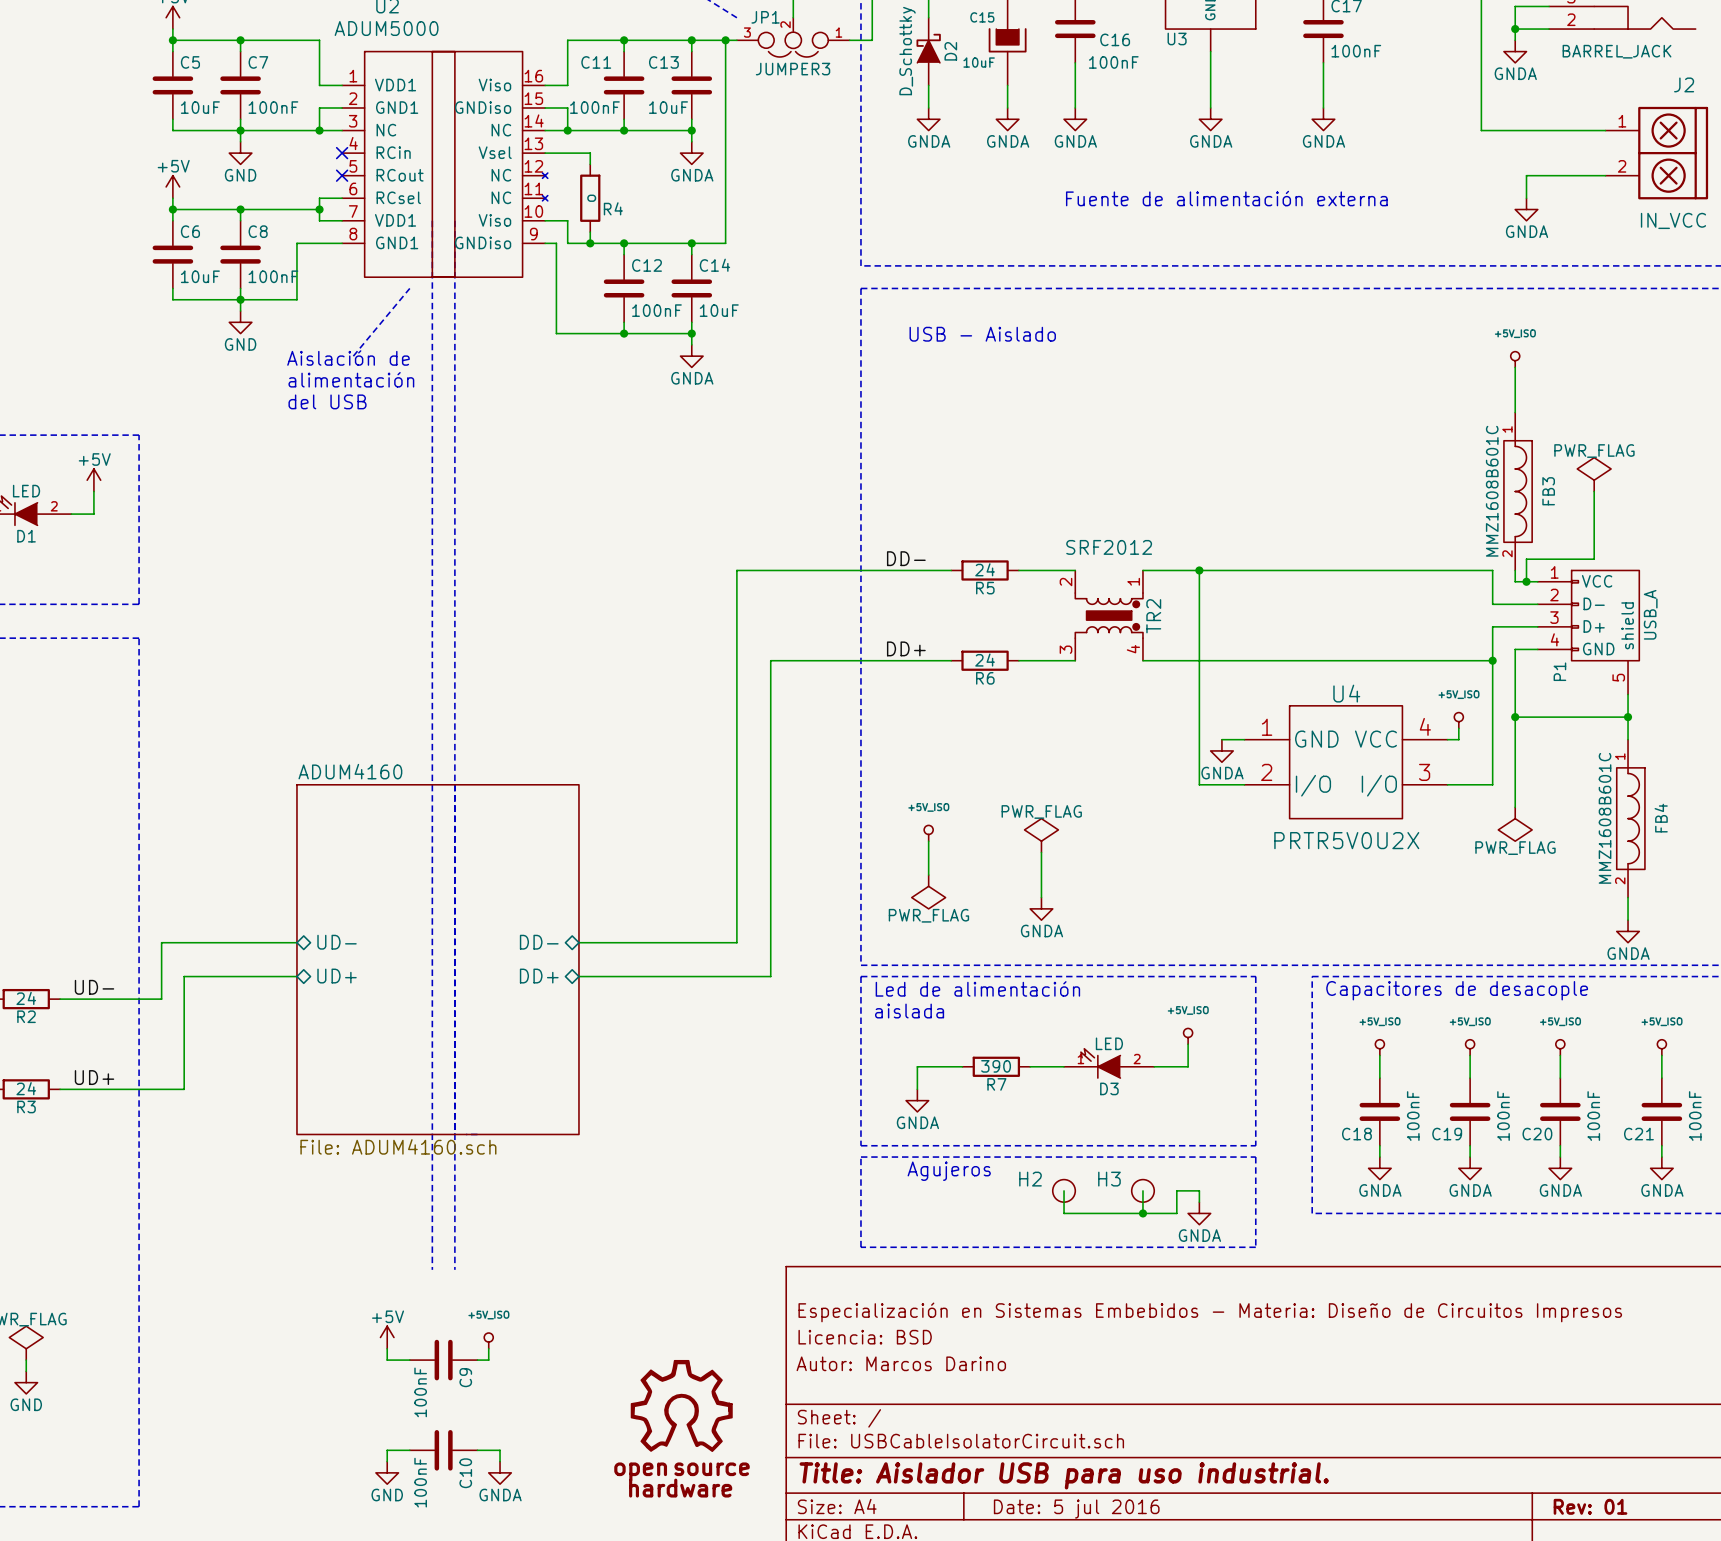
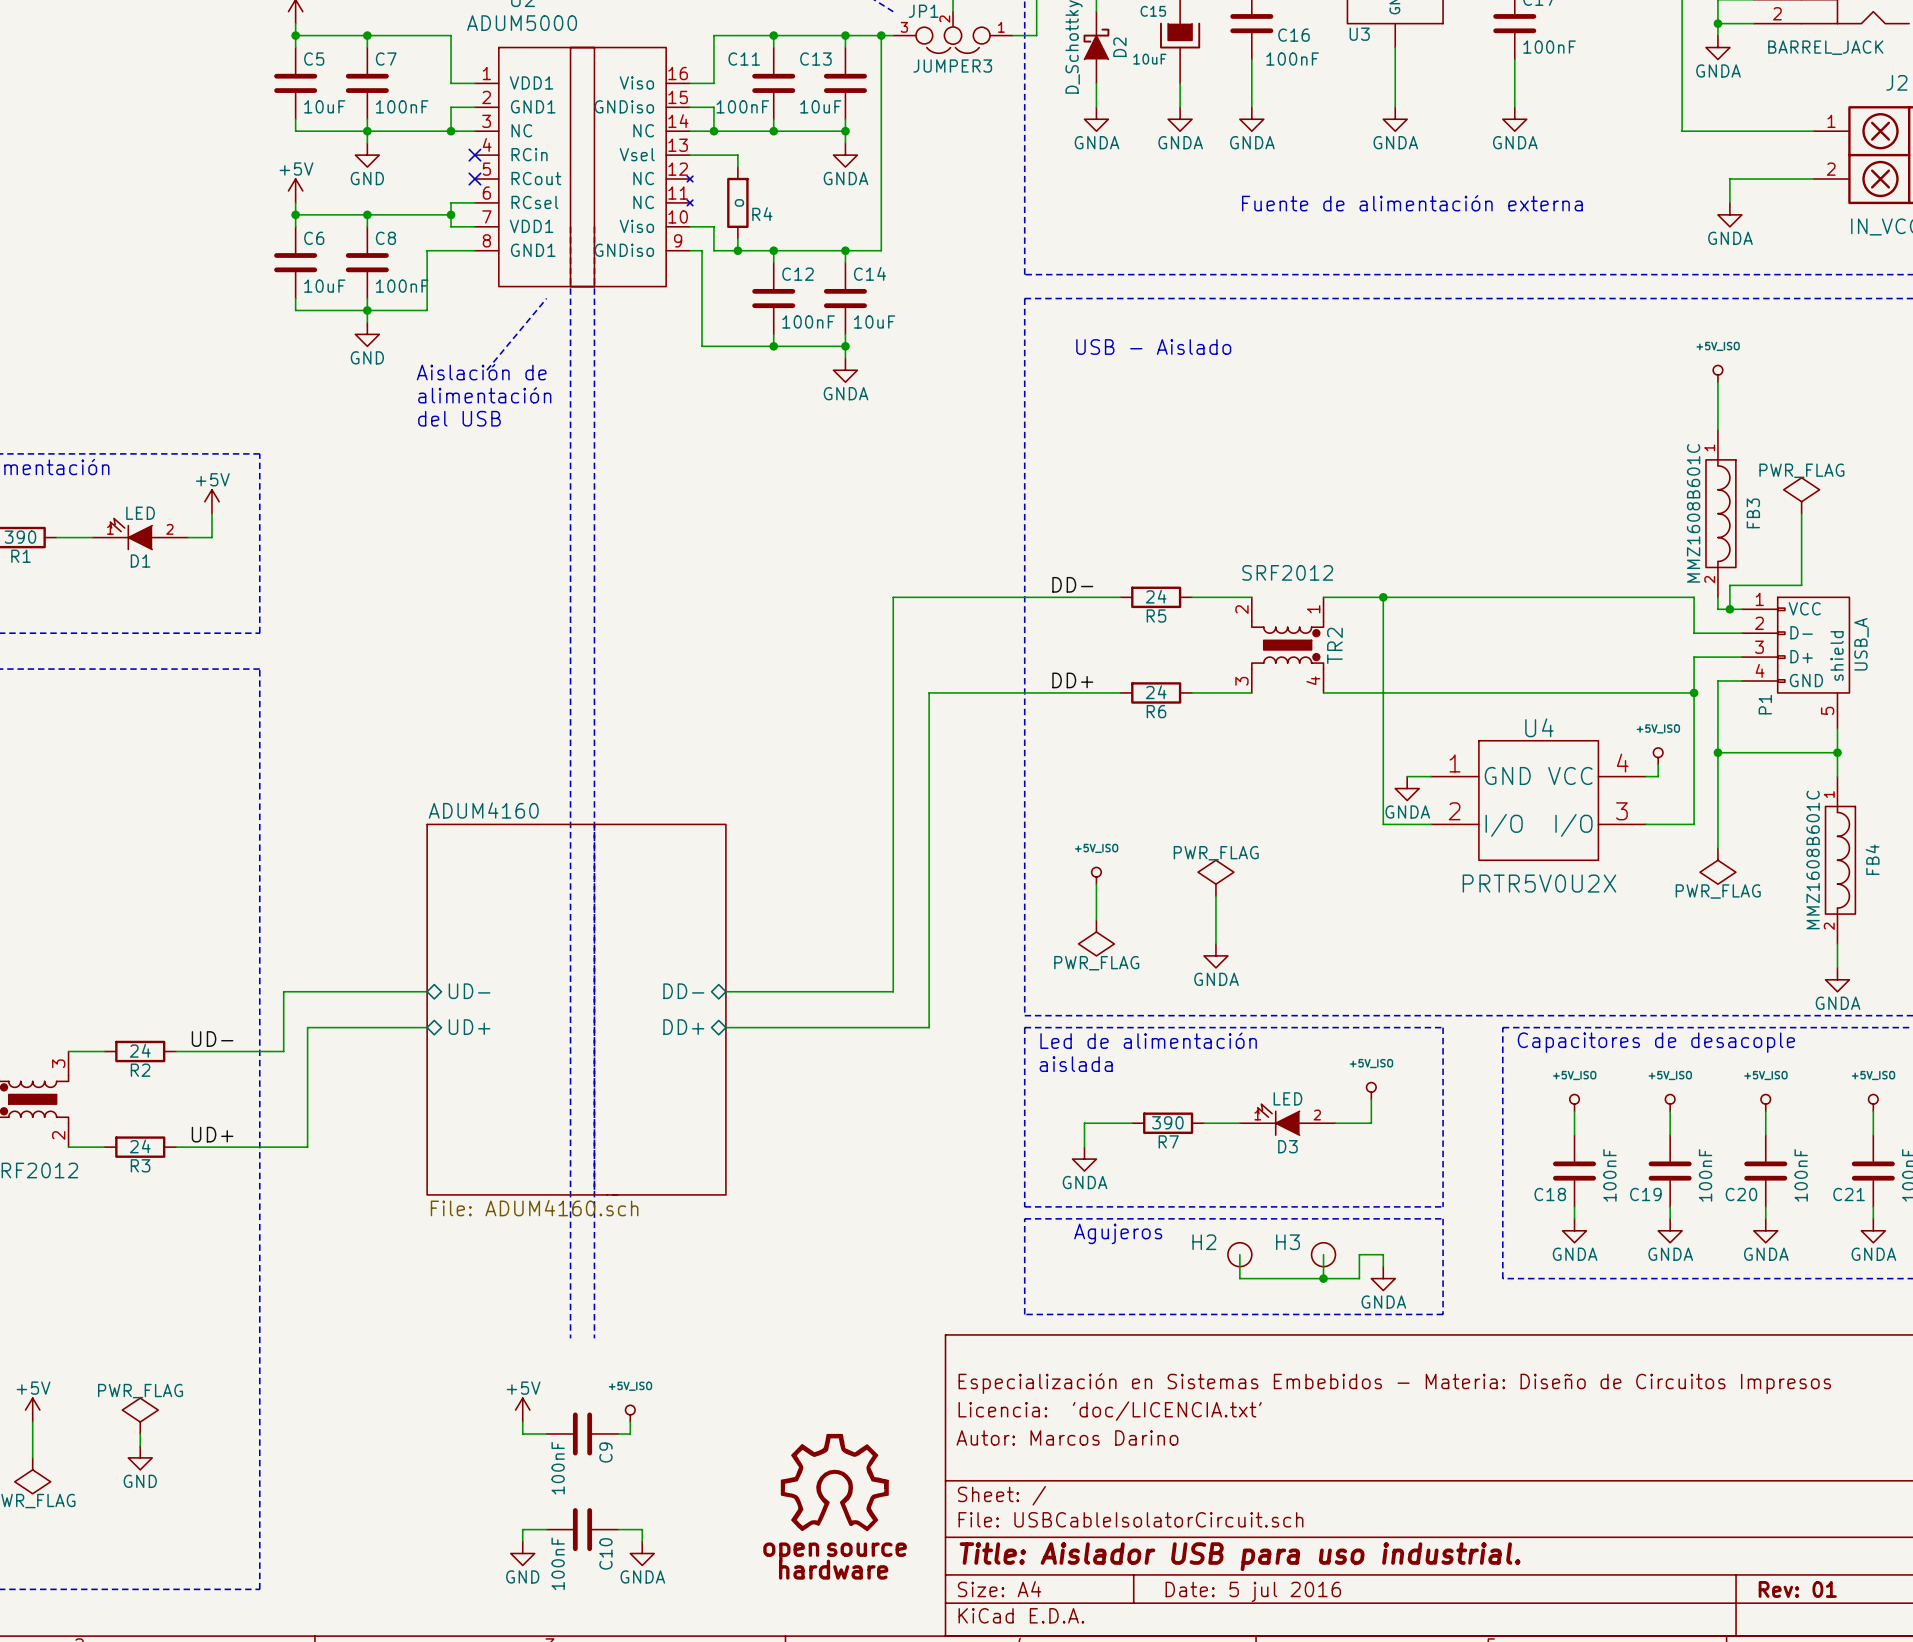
title block: Licencia: BSD (865, 1337) -> Licencia: 'doc/LICENCIA.txt' (1110, 1411)

